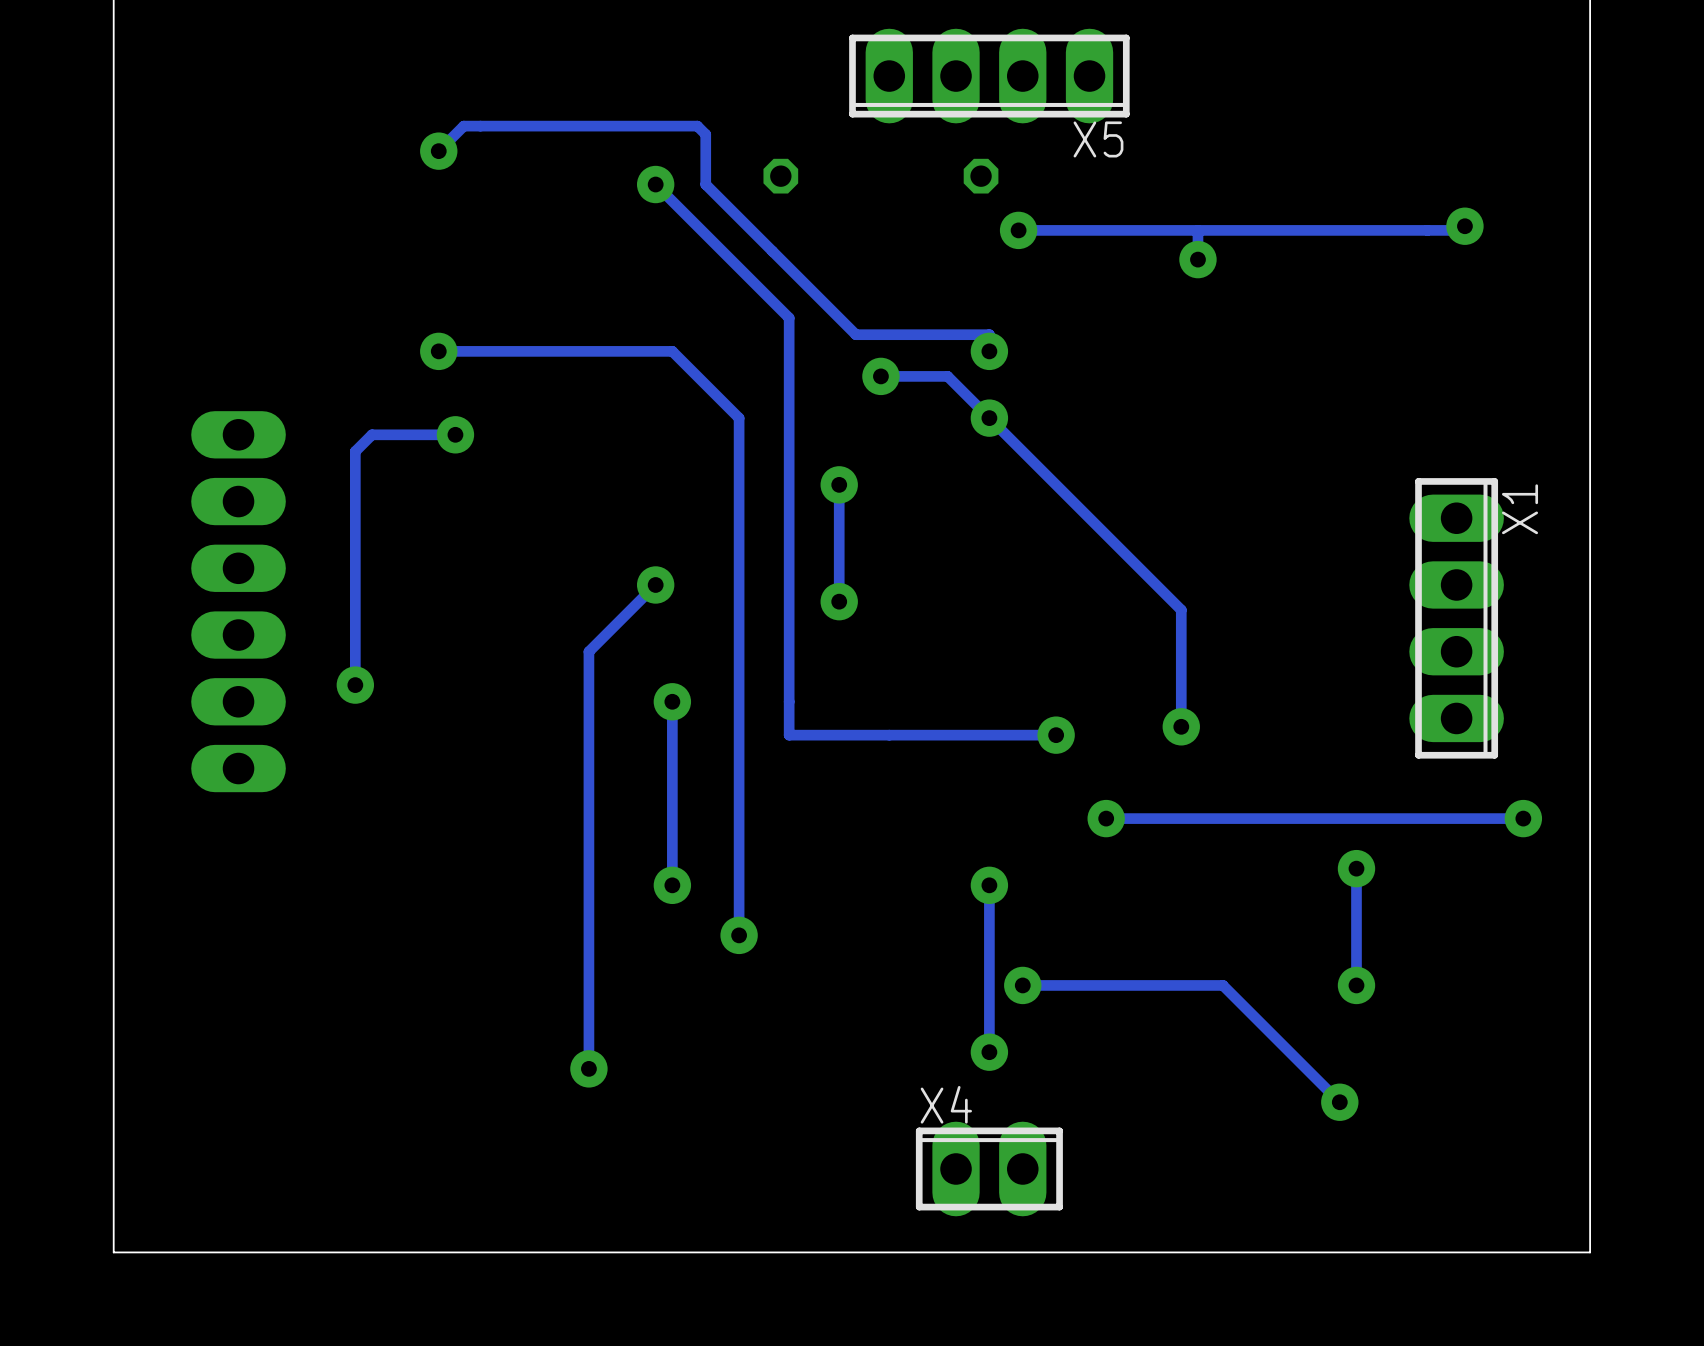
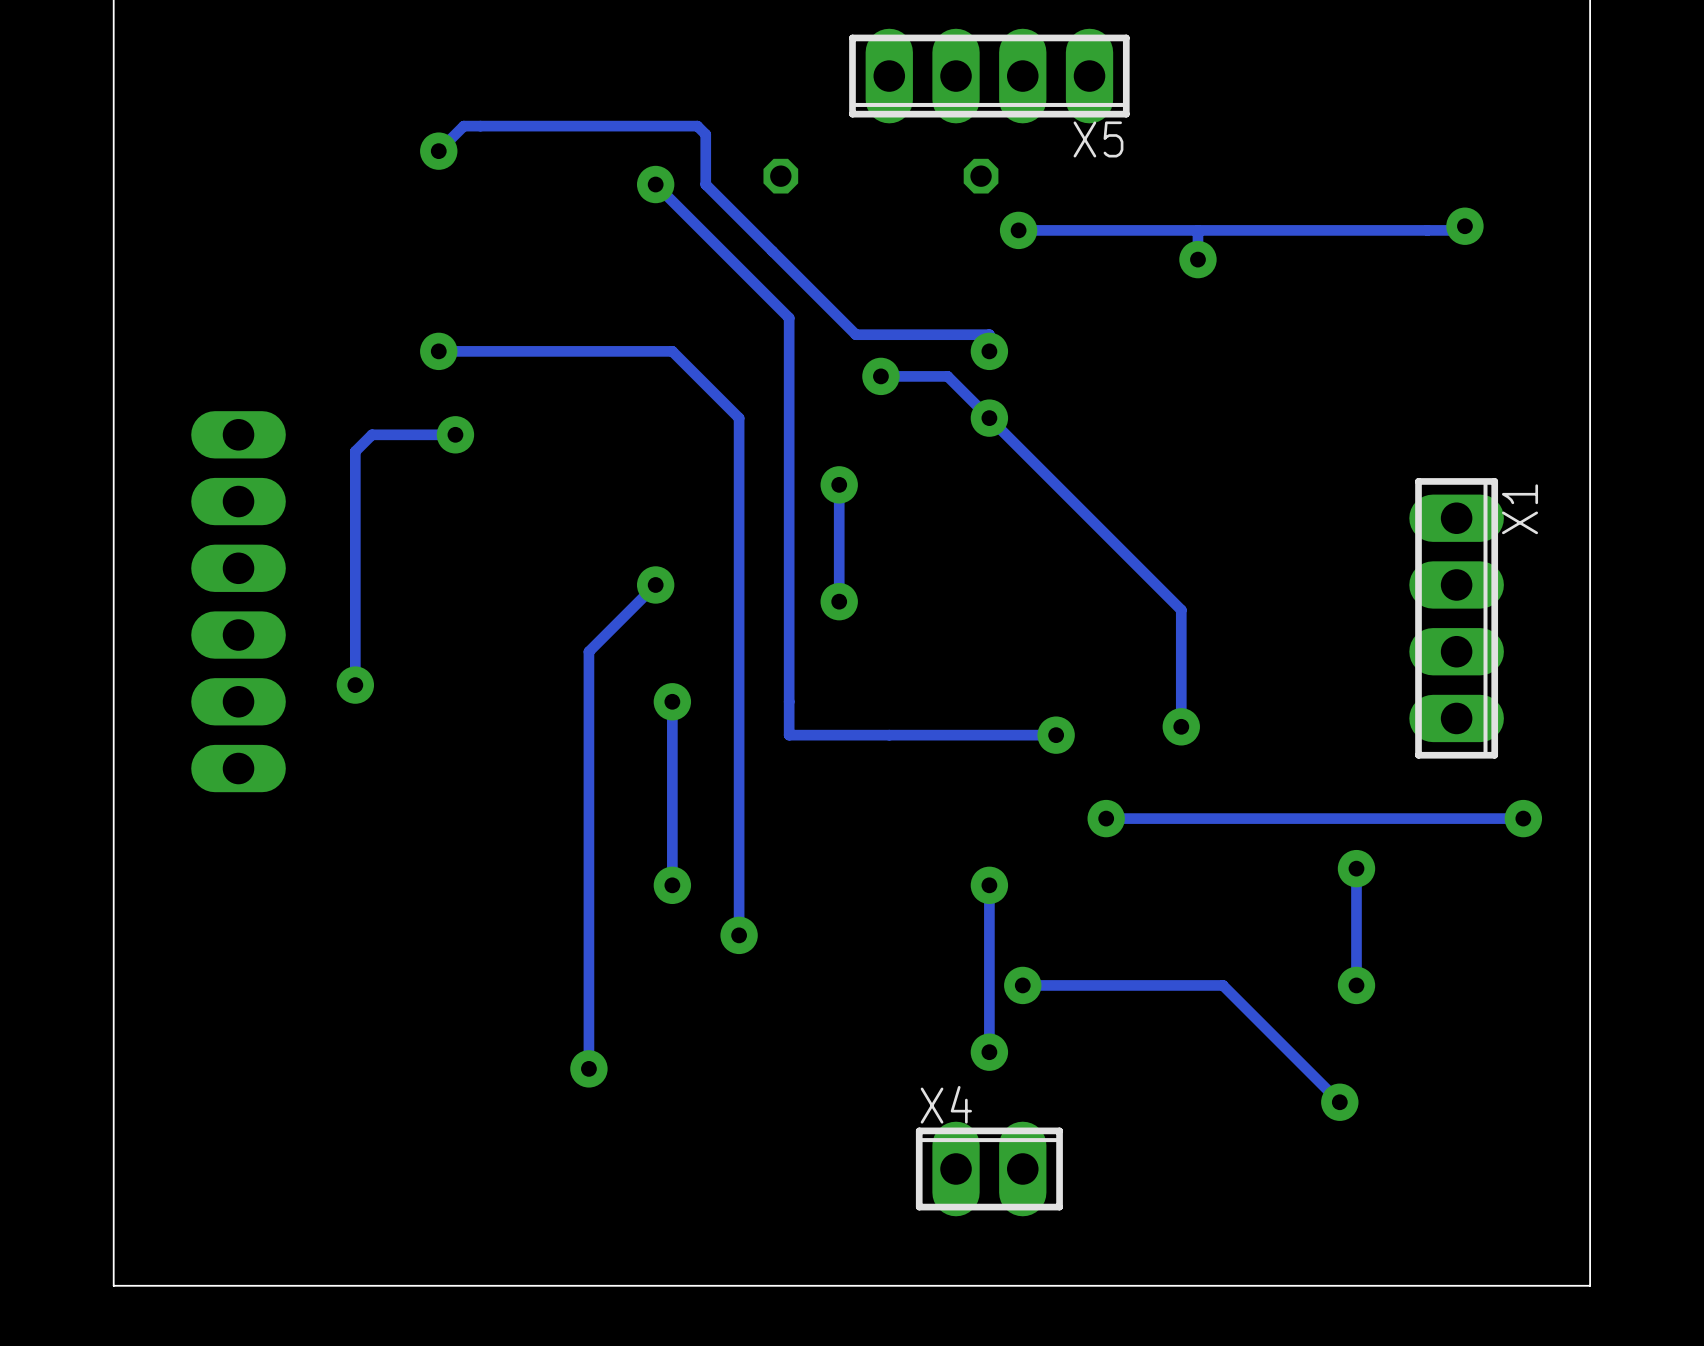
board edge: (1590, 1252) (113, 1252) -> (1590, 1252) (1590, 1285) (113, 1285) (113, 1252)

